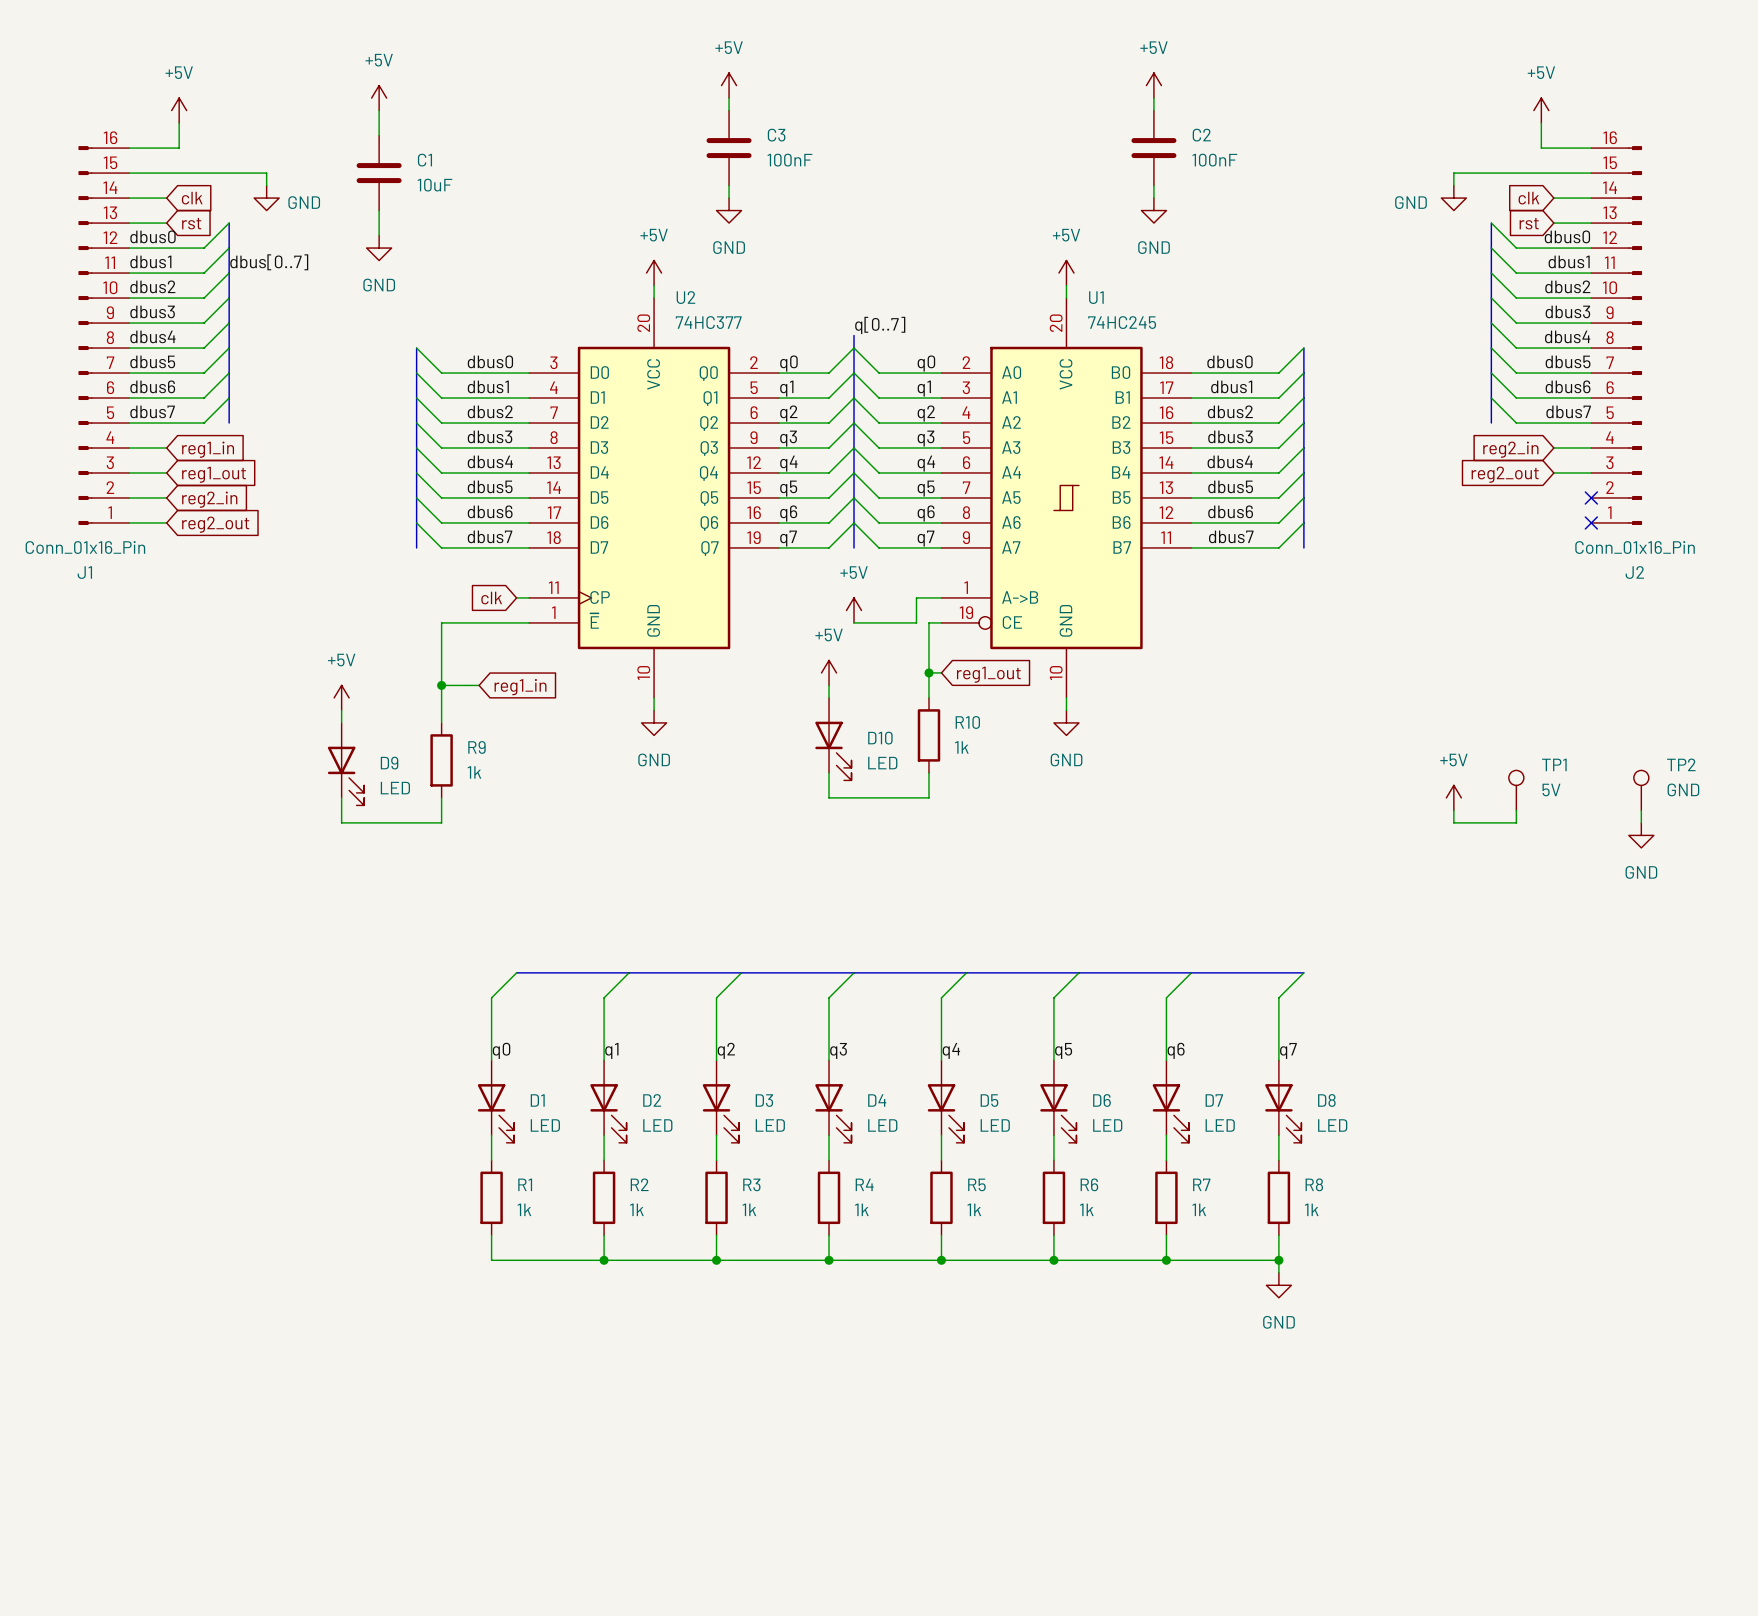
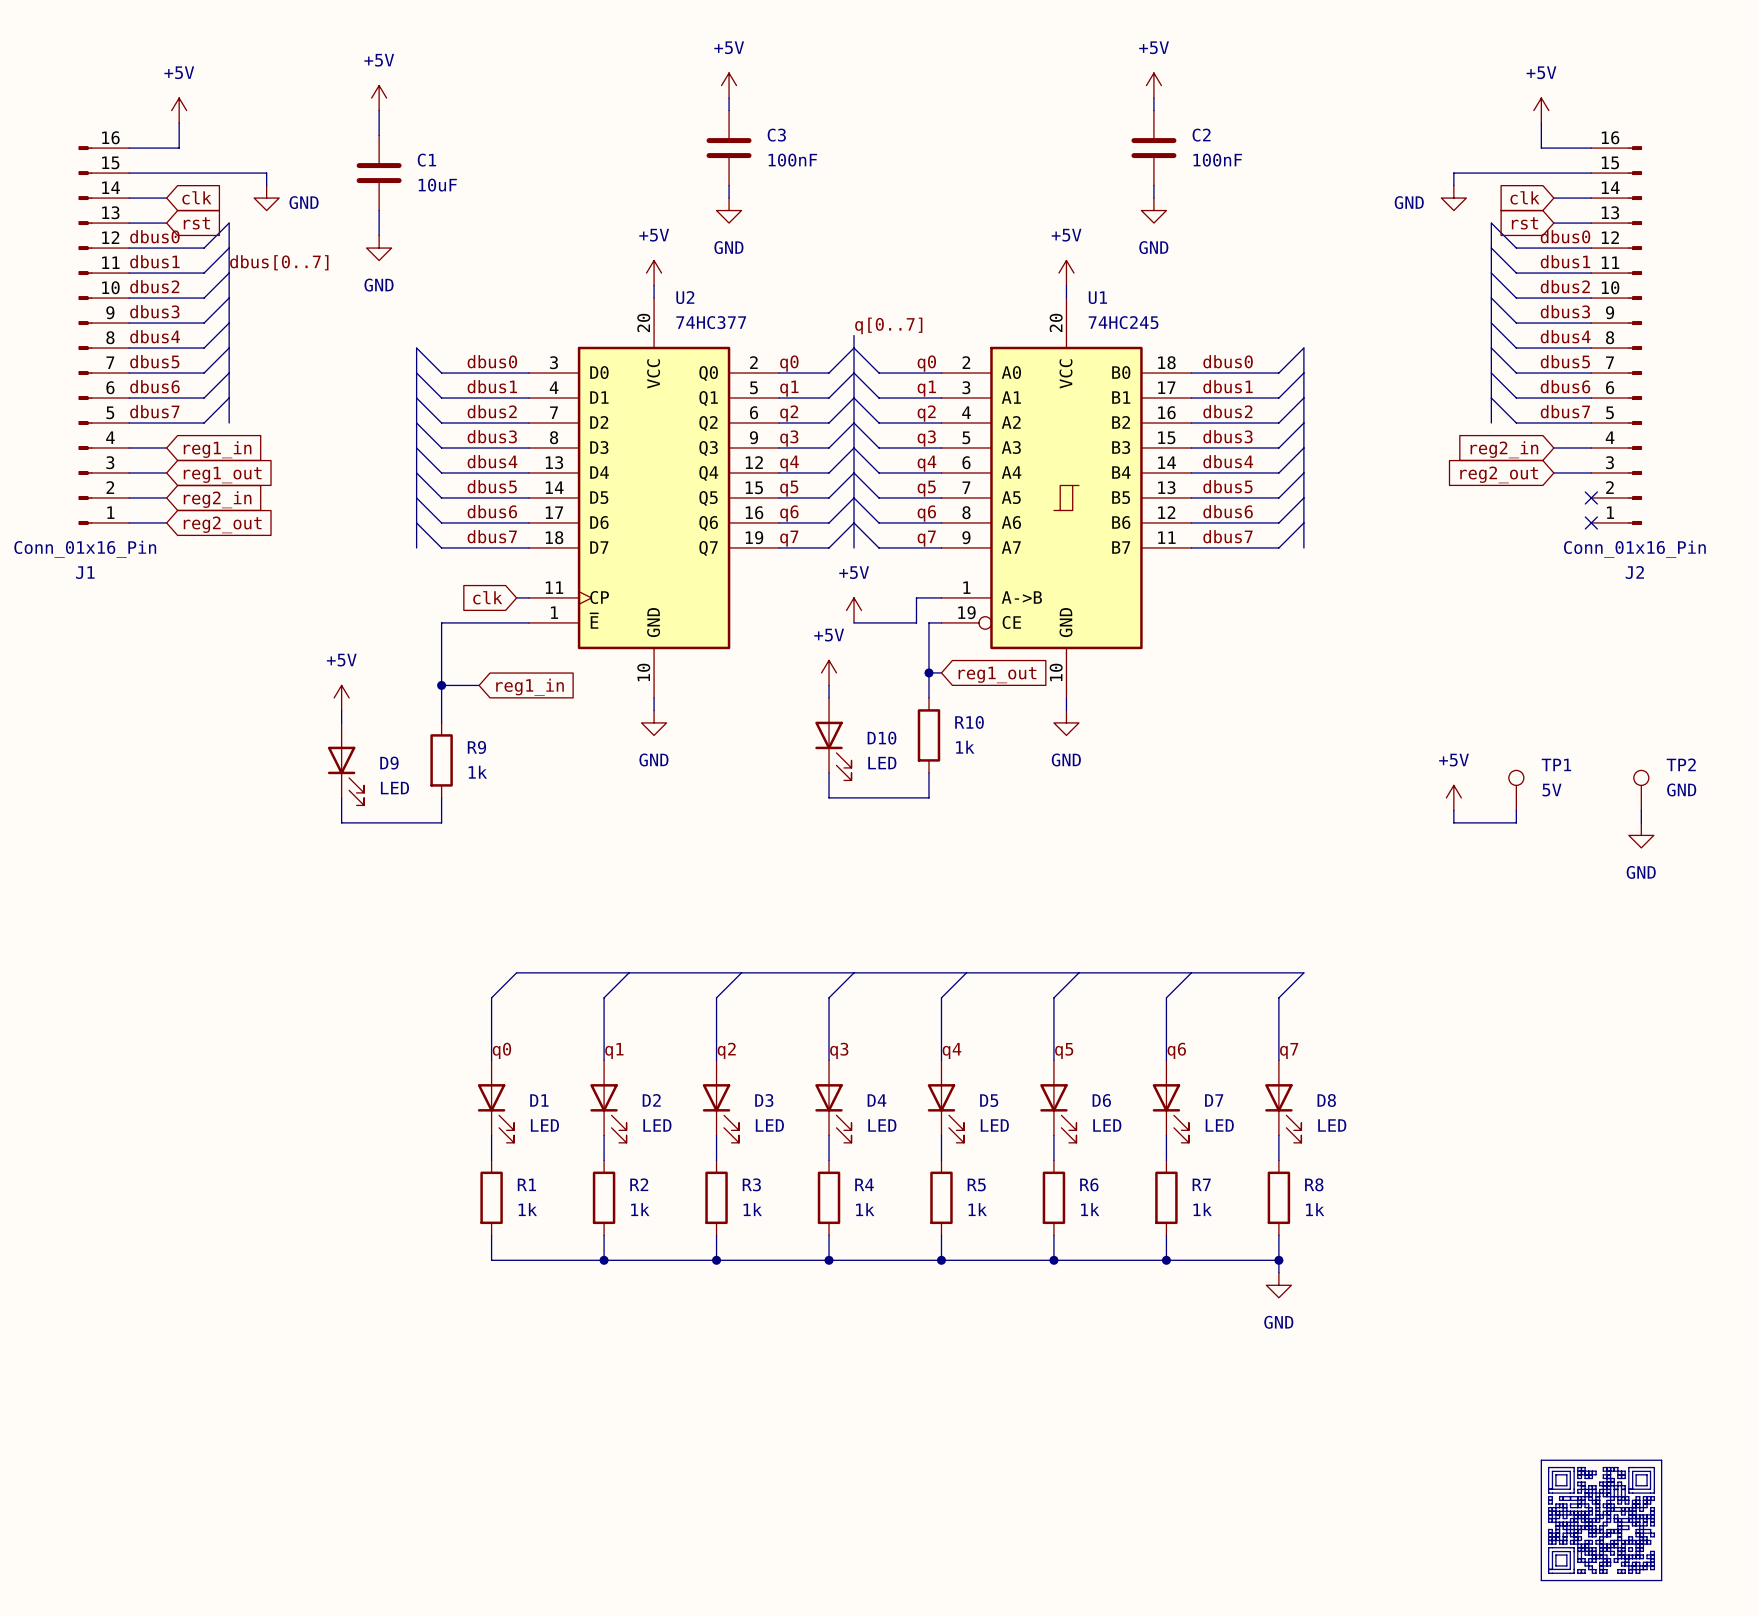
line: none -> (1541, 1460) (1541, 1580) (1661, 1580) (1661, 1460) (1541, 1460)
line: none -> (1548, 1467) (1574, 1467) (1574, 1493) (1548, 1493) (1548, 1467)
line: none -> (1581, 1467) (1581, 1478) (1577, 1478) (1577, 1467) (1585, 1467) (1585, 1478) (1592, 1478) (1592, 1471)
line: none -> (1603, 1467) (1603, 1471) (1625, 1471) (1625, 1478) (1617, 1478) (1617, 1467) (1603, 1467)
line: none -> (1606, 1467) (1606, 1496)
line: none -> (1610, 1467) (1610, 1522) (1603, 1522) (1603, 1573)
line: none -> (1628, 1467) (1628, 1493) (1654, 1493) (1654, 1467) (1628, 1467)
line: none -> (1577, 1471) (1596, 1471) (1596, 1474) (1577, 1474)
line: none -> (1588, 1471) (1588, 1478)
line: none -> (1621, 1471) (1621, 1478)
line: none -> (1555, 1474) (1555, 1485) (1566, 1485) (1566, 1474) (1555, 1474)
line: none -> (1610, 1474) (1603, 1474) (1603, 1478) (1614, 1478) (1614, 1500) (1606, 1500) (1606, 1525) (1599, 1525) (1599, 1533)
line: none -> (1617, 1474) (1625, 1474)
line: none -> (1636, 1474) (1636, 1485) (1647, 1485) (1647, 1474) (1636, 1474)
line: none -> (1581, 1482) (1581, 1493) (1577, 1493) (1577, 1489) (1596, 1489)
line: none -> (1603, 1482) (1603, 1496) (1628, 1496) (1628, 1504) (1625, 1504) (1625, 1485) (1599, 1485) (1599, 1482) (1614, 1482)
line: none -> (1617, 1482) (1621, 1482) (1621, 1504) (1617, 1504) (1617, 1482)
line: none -> (1585, 1485) (1577, 1485) (1577, 1482) (1585, 1482) (1585, 1507) (1592, 1507) (1592, 1514) (1548, 1514)
line: none -> (1592, 1485) (1592, 1504) (1599, 1504)
line: none -> (1548, 1489) (1570, 1489) (1570, 1471) (1552, 1471) (1552, 1489)
line: none -> (1610, 1489) (1599, 1489) (1599, 1522) (1581, 1522) (1581, 1511)
line: none -> (1628, 1489) (1650, 1489) (1650, 1471) (1632, 1471) (1632, 1489)
line: none -> (1585, 1493) (1610, 1493)
line: none -> (1548, 1496) (1552, 1496) (1552, 1504) (1548, 1504) (1548, 1496)
line: none -> (1577, 1496) (1577, 1507)
line: none -> (1581, 1496) (1581, 1507) (1570, 1507) (1570, 1504) (1588, 1504) (1588, 1536) (1596, 1536) (1596, 1525) (1555, 1525)
line: none -> (1592, 1496) (1559, 1496) (1559, 1500) (1585, 1500)
line: none -> (1647, 1496) (1647, 1507) (1603, 1507) (1603, 1504) (1614, 1504) (1614, 1511)
line: none -> (1650, 1496) (1650, 1504) (1643, 1504)
line: none -> (1599, 1500) (1588, 1500) (1588, 1485) (1596, 1485) (1596, 1522)
line: none -> (1617, 1500) (1628, 1500)
line: none -> (1639, 1500) (1632, 1500) (1632, 1525) (1647, 1525) (1647, 1514)
line: none -> (1643, 1500) (1654, 1500) (1654, 1496) (1643, 1496) (1643, 1511) (1639, 1511) (1639, 1496) (1636, 1496) (1636, 1525)
line: none -> (1563, 1504) (1563, 1518) (1566, 1518) (1566, 1504) (1555, 1504) (1555, 1544) (1548, 1544) (1548, 1529) (1552, 1529) (1552, 1544)
line: none -> (1632, 1504) (1639, 1504)
line: none -> (1552, 1507) (1552, 1522)
line: none -> (1566, 1507) (1548, 1507) (1548, 1522) (1577, 1522)
line: none -> (1621, 1507) (1621, 1514) (1625, 1514) (1625, 1507)
line: none -> (1628, 1507) (1628, 1522)
line: none -> (1650, 1507) (1650, 1525) (1654, 1525) (1654, 1507) (1650, 1507)
line: none -> (1548, 1511) (1592, 1511)
line: none -> (1559, 1511) (1559, 1518) (1548, 1518)
line: none -> (1574, 1511) (1574, 1544)
line: none -> (1577, 1511) (1577, 1562) (1596, 1562) (1596, 1547) (1577, 1547)
line: none -> (1585, 1511) (1585, 1529)
line: none -> (1636, 1511) (1603, 1511) (1603, 1518) (1570, 1518) (1570, 1536) (1581, 1536) (1581, 1540) (1570, 1540) (1570, 1544) (1592, 1544) (1592, 1540) (1585, 1540) (1585, 1555) (1606, 1555) (1606, 1565)
line: none -> (1596, 1514) (1610, 1514)
line: none -> (1628, 1514) (1654, 1514)
line: none -> (1639, 1514) (1639, 1558)
line: none -> (1643, 1514) (1643, 1551) (1636, 1551)
line: none -> (1592, 1518) (1592, 1536)
line: none -> (1614, 1518) (1654, 1518)
line: none -> (1621, 1518) (1621, 1558)
line: none -> (1559, 1522) (1559, 1544) (1566, 1544) (1566, 1522)
line: none -> (1563, 1522) (1563, 1529) (1603, 1529)
line: none -> (1639, 1522) (1614, 1522) (1614, 1514) (1617, 1514) (1617, 1562) (1614, 1562) (1614, 1558) (1643, 1558) (1643, 1555) (1617, 1555)
line: none -> (1581, 1525) (1581, 1533) (1563, 1533) (1563, 1544)
line: none -> (1617, 1525) (1628, 1525) (1628, 1529) (1606, 1529) (1606, 1536)
line: none -> (1610, 1529) (1610, 1536) (1599, 1536) (1599, 1558)
line: none -> (1548, 1533) (1559, 1533)
line: none -> (1588, 1533) (1621, 1533)
line: none -> (1636, 1533) (1654, 1533) (1654, 1536) (1650, 1536) (1650, 1529) (1636, 1529) (1636, 1536) (1647, 1536) (1647, 1544)
line: none -> (1548, 1536) (1559, 1536)
line: none -> (1548, 1540) (1566, 1540)
line: none -> (1588, 1540) (1588, 1555)
line: none -> (1603, 1540) (1596, 1540) (1596, 1544) (1617, 1544)
line: none -> (1614, 1540) (1614, 1547)
line: none -> (1625, 1540) (1625, 1565)
line: none -> (1636, 1540) (1636, 1558)
line: none -> (1581, 1544) (1581, 1562)
line: none -> (1606, 1544) (1606, 1551)
line: none -> (1621, 1544) (1650, 1544) (1650, 1540) (1610, 1540) (1610, 1555) (1614, 1555) (1614, 1551) (1599, 1551)
line: none -> (1628, 1544) (1628, 1536) (1632, 1536) (1632, 1544)
line: none -> (1548, 1547) (1574, 1547) (1574, 1573) (1548, 1573) (1548, 1547)
line: none -> (1592, 1547) (1592, 1562)
line: none -> (1599, 1547) (1625, 1547)
line: none -> (1628, 1547) (1628, 1551) (1632, 1551) (1632, 1547) (1628, 1547)
line: none -> (1636, 1547) (1643, 1547)
line: none -> (1577, 1551) (1596, 1551)
line: none -> (1617, 1551) (1625, 1551)
line: none -> (1650, 1551) (1650, 1569) (1654, 1569) (1654, 1551) (1650, 1551)
line: none -> (1555, 1555) (1555, 1565) (1566, 1565) (1566, 1555) (1555, 1555)
line: none -> (1628, 1555) (1628, 1573) (1632, 1573) (1632, 1562) (1639, 1562) (1639, 1573) (1636, 1573) (1636, 1562)
line: none -> (1654, 1555) (1647, 1555) (1647, 1558) (1654, 1558)
line: none -> (1577, 1558) (1585, 1558) (1585, 1565) (1592, 1565) (1592, 1573) (1596, 1573) (1596, 1569) (1588, 1569) (1588, 1558) (1610, 1558) (1610, 1565) (1599, 1565)
line: none -> (1610, 1562) (1599, 1562) (1599, 1573) (1606, 1573) (1606, 1569) (1599, 1569)
line: none -> (1628, 1562) (1621, 1562) (1621, 1565) (1654, 1565)
line: none -> (1647, 1562) (1647, 1569) (1628, 1569)
line: none -> (1654, 1562) (1643, 1562) (1643, 1569)
line: none -> (1548, 1569) (1570, 1569) (1570, 1551) (1552, 1551) (1552, 1569)
line: none -> (1577, 1569) (1585, 1569) (1585, 1573) (1577, 1573) (1577, 1569)
line: none -> (1617, 1569) (1625, 1569) (1625, 1573) (1617, 1573) (1617, 1569)

